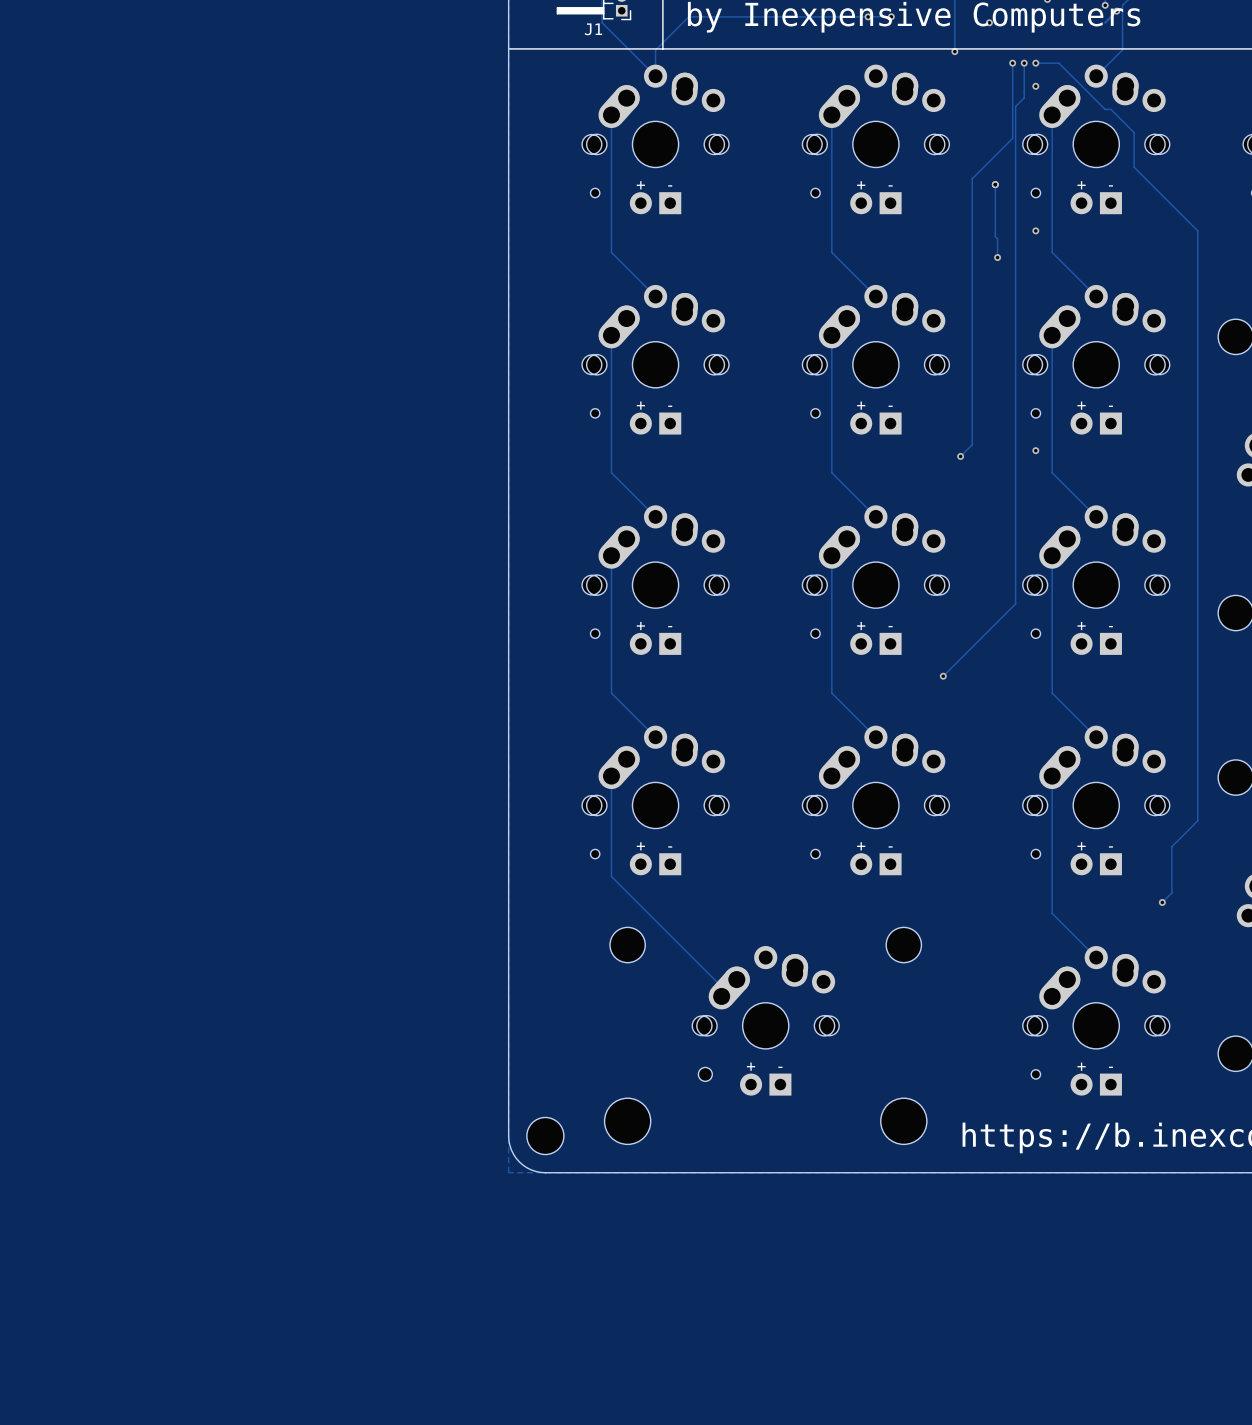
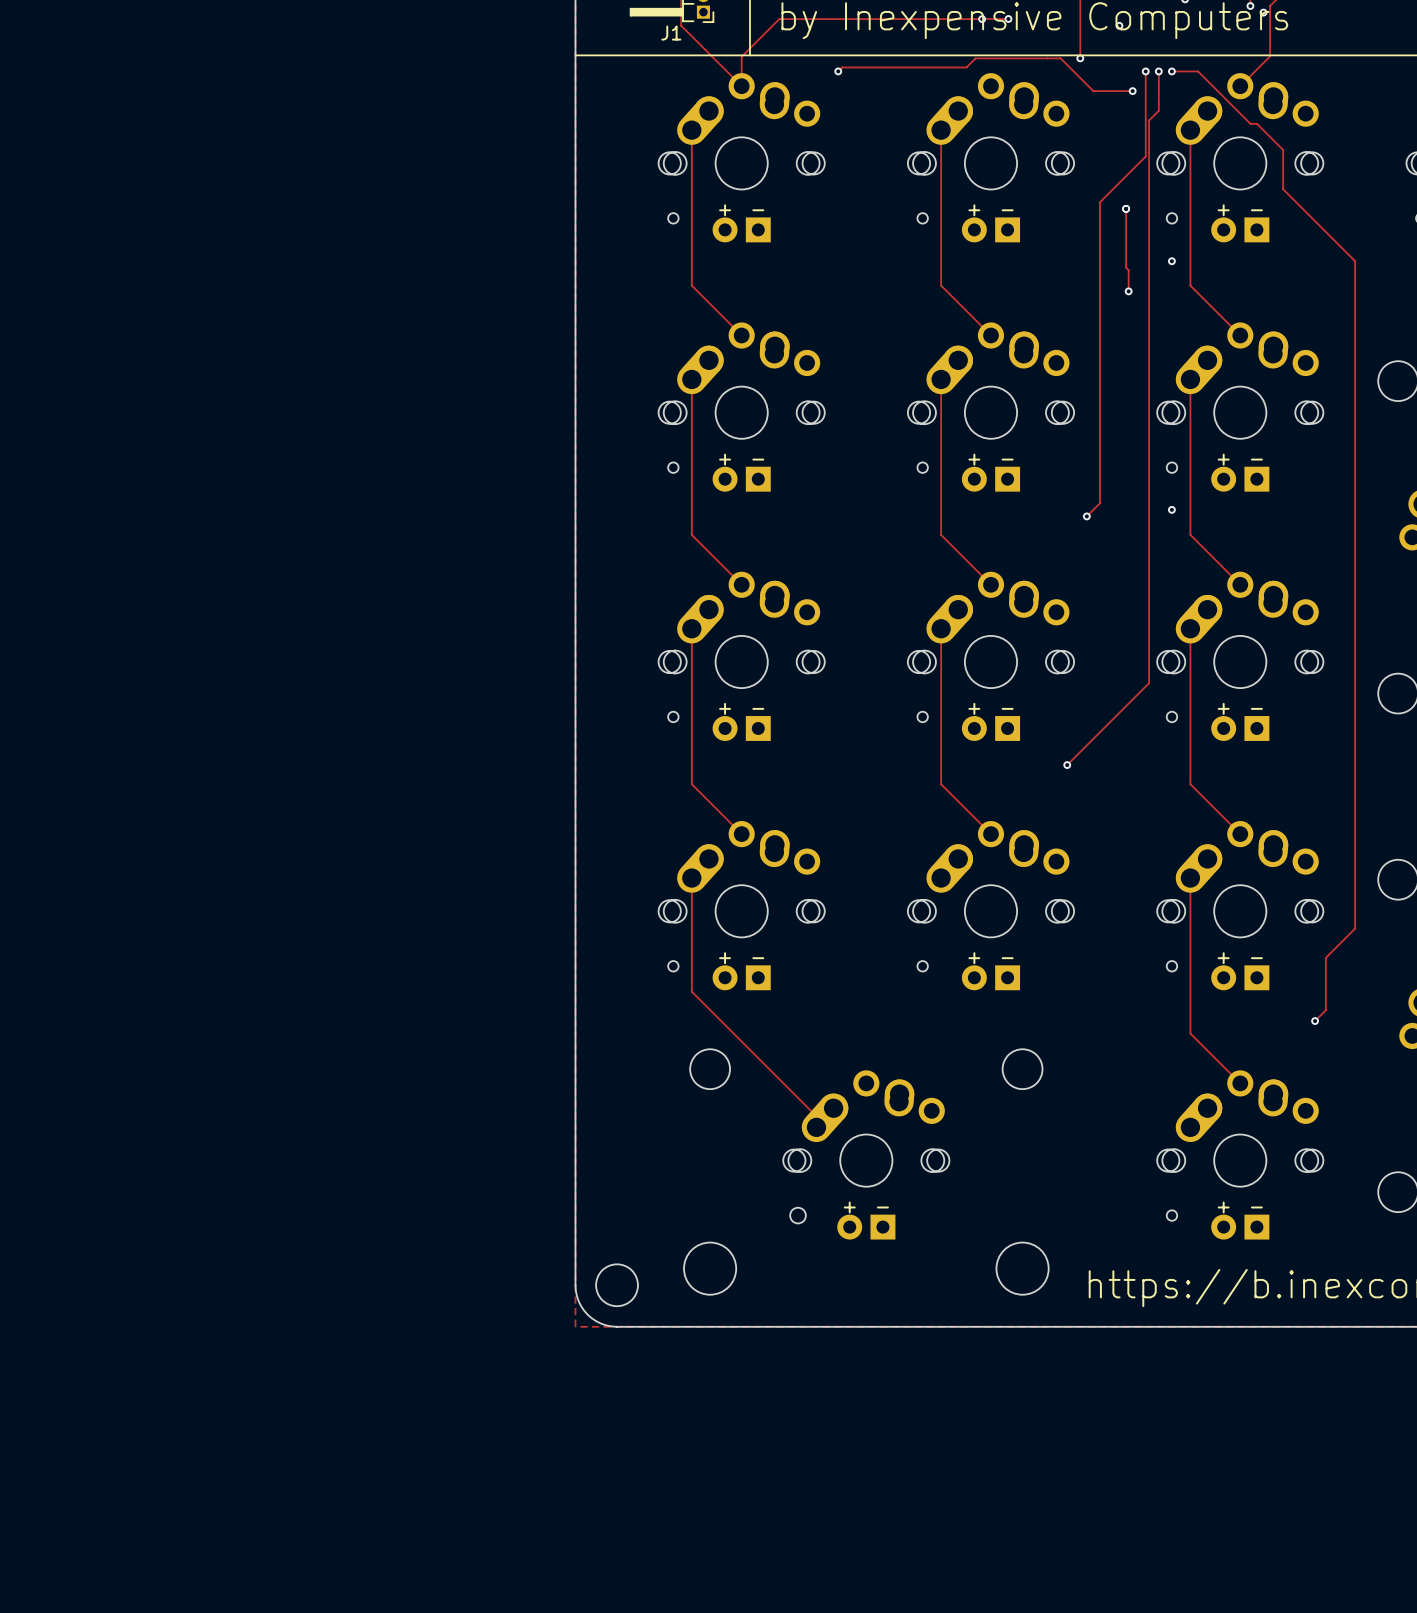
track: (1116, 11) (1105, 22) -> none
track: none -> (838, 71) (842, 67) (966, 67) (975, 58) (1060, 58) (1093, 91) (1132, 91)
via: none -> (838, 71)
via position: (1035, 86) -> (1132, 91)

